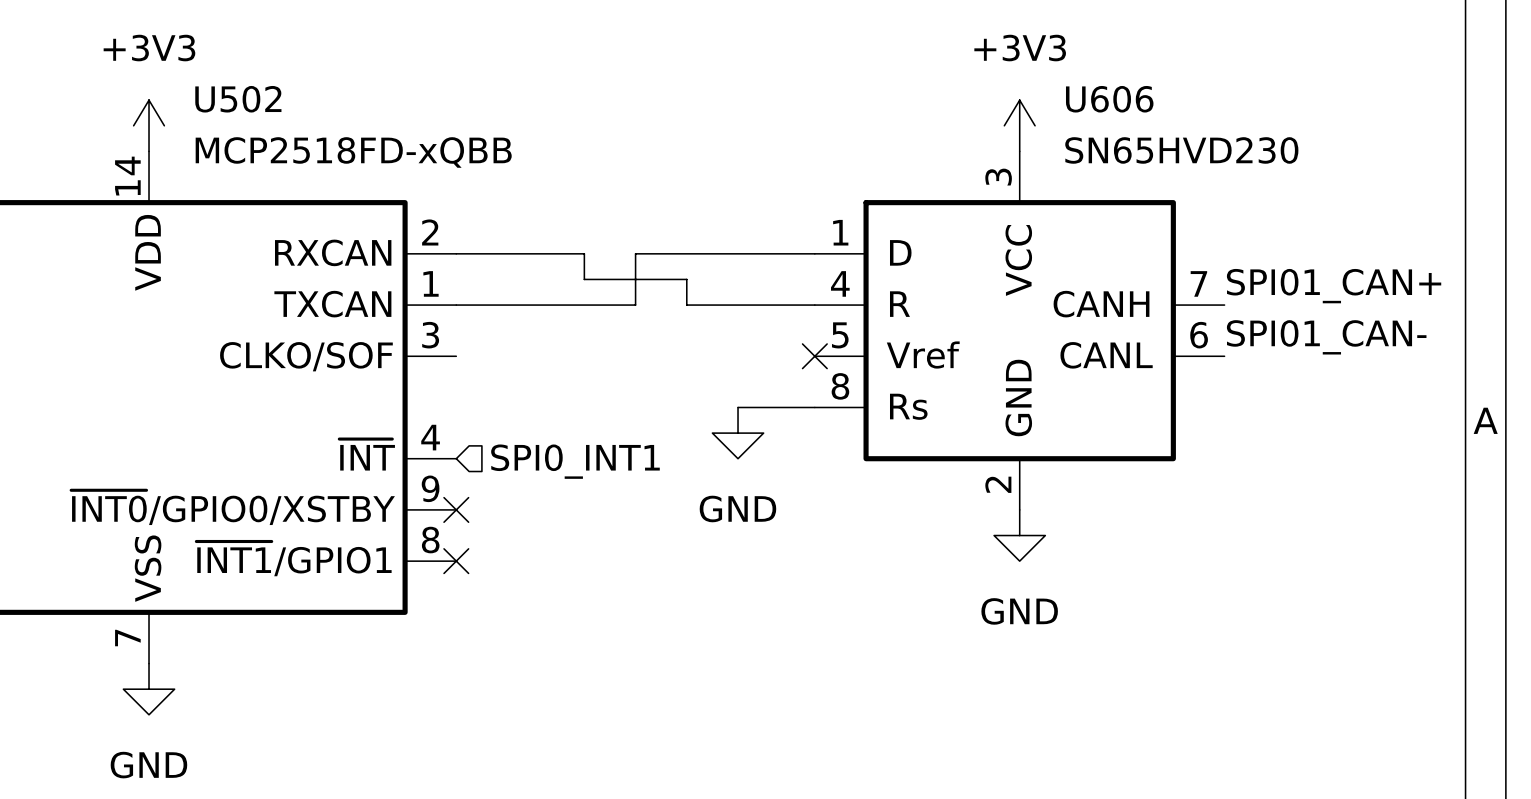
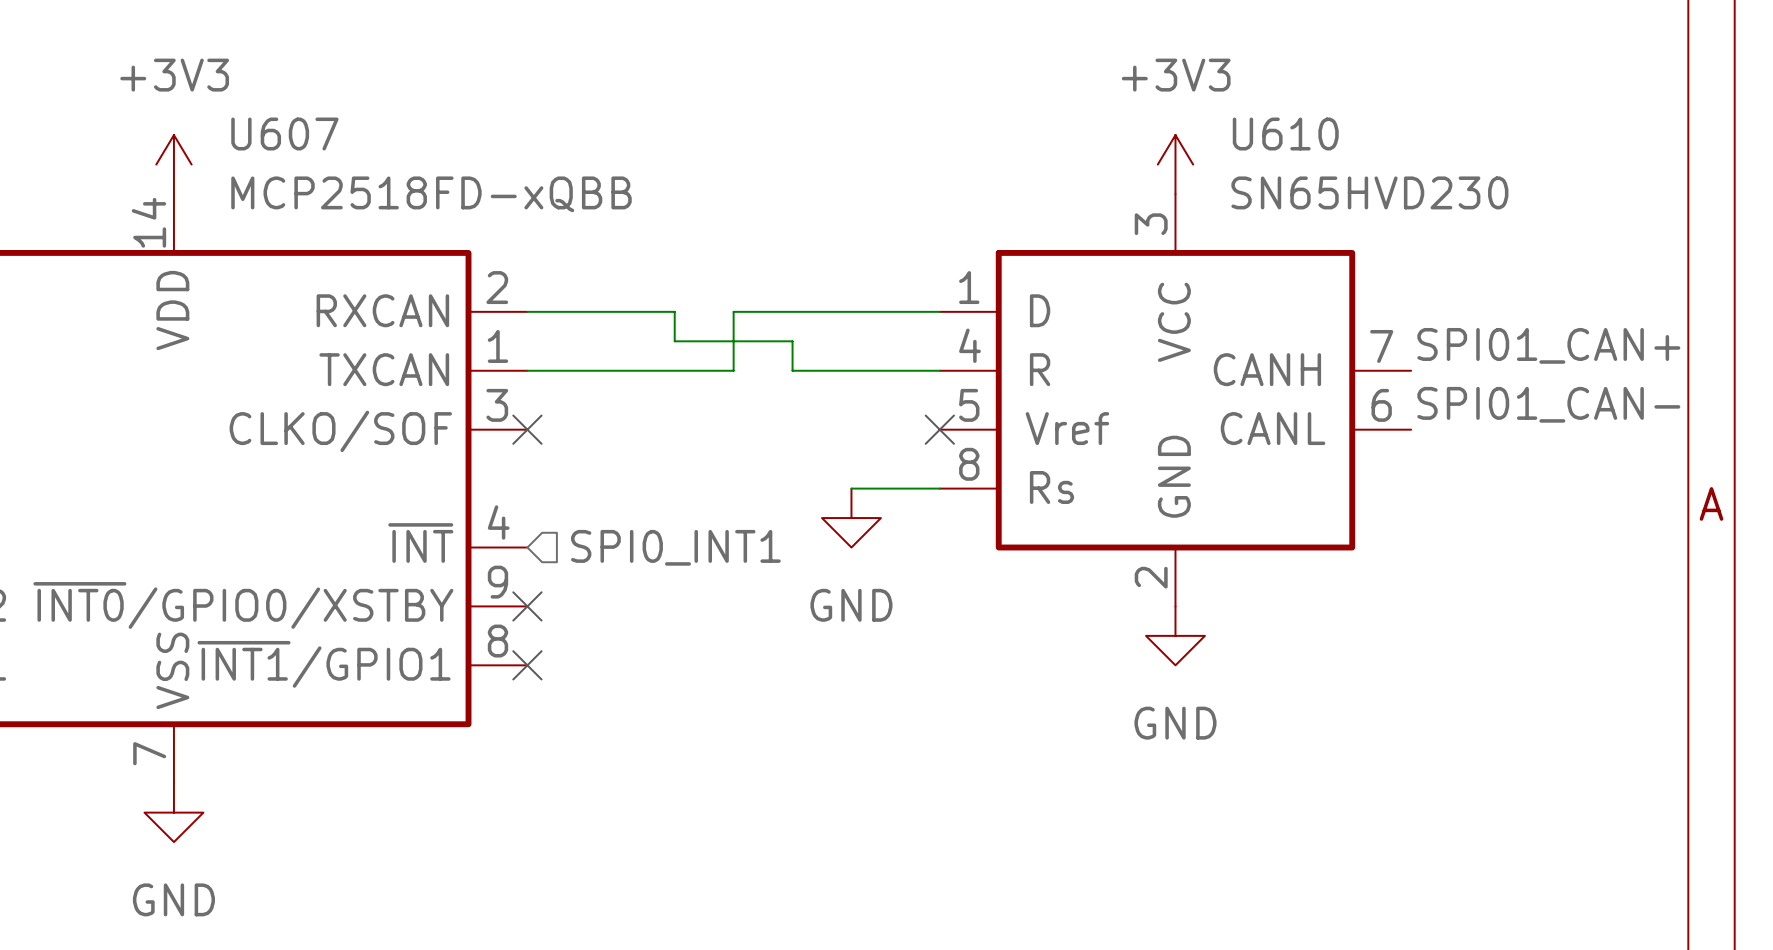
U502 name: U502 (238, 99) -> U607 (284, 134)
U606 name: U606 (1109, 99) -> U610 (1285, 134)
no-connect mark: none -> (527, 429)

